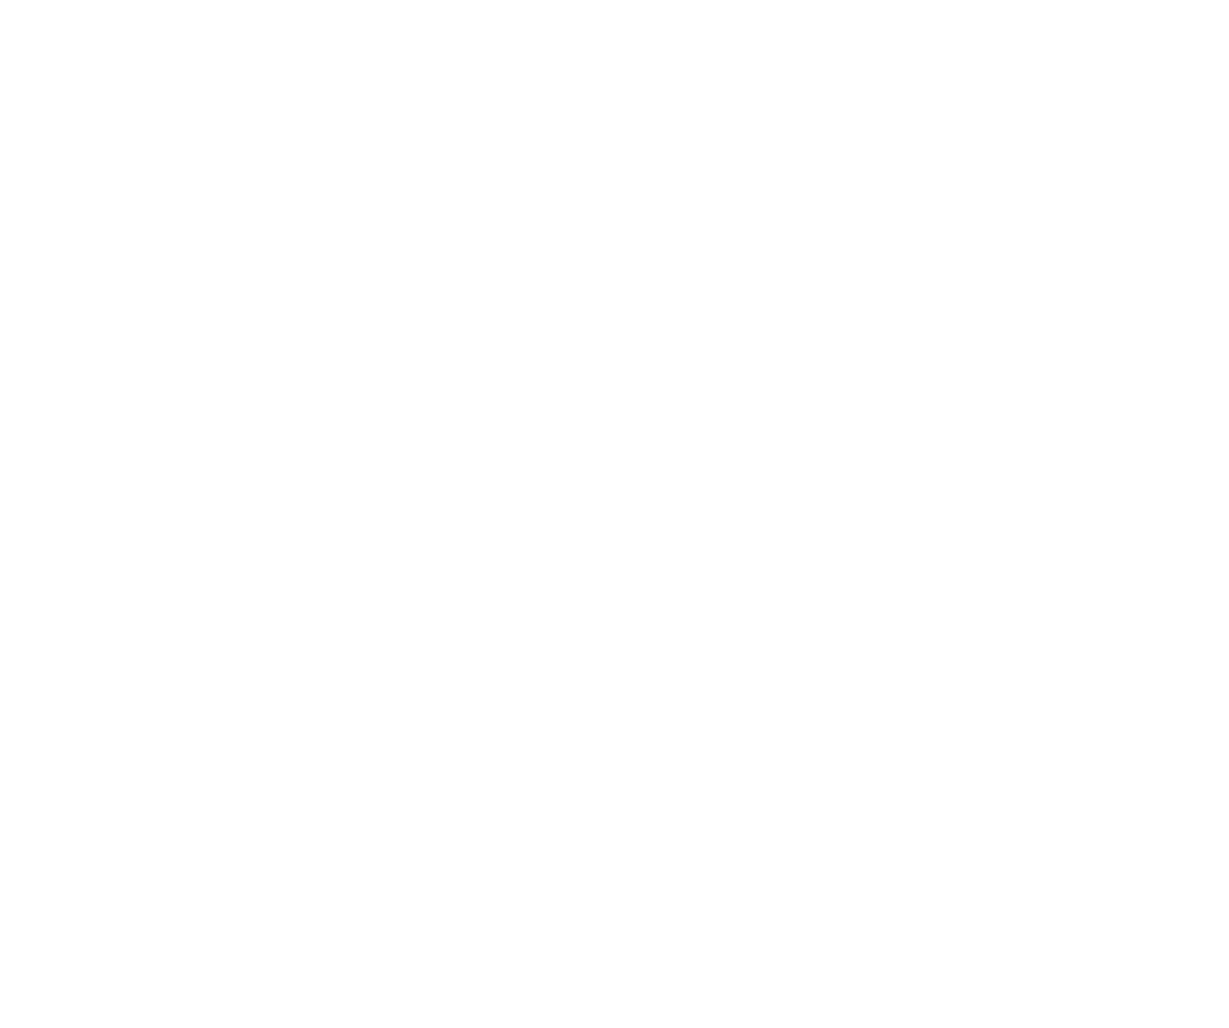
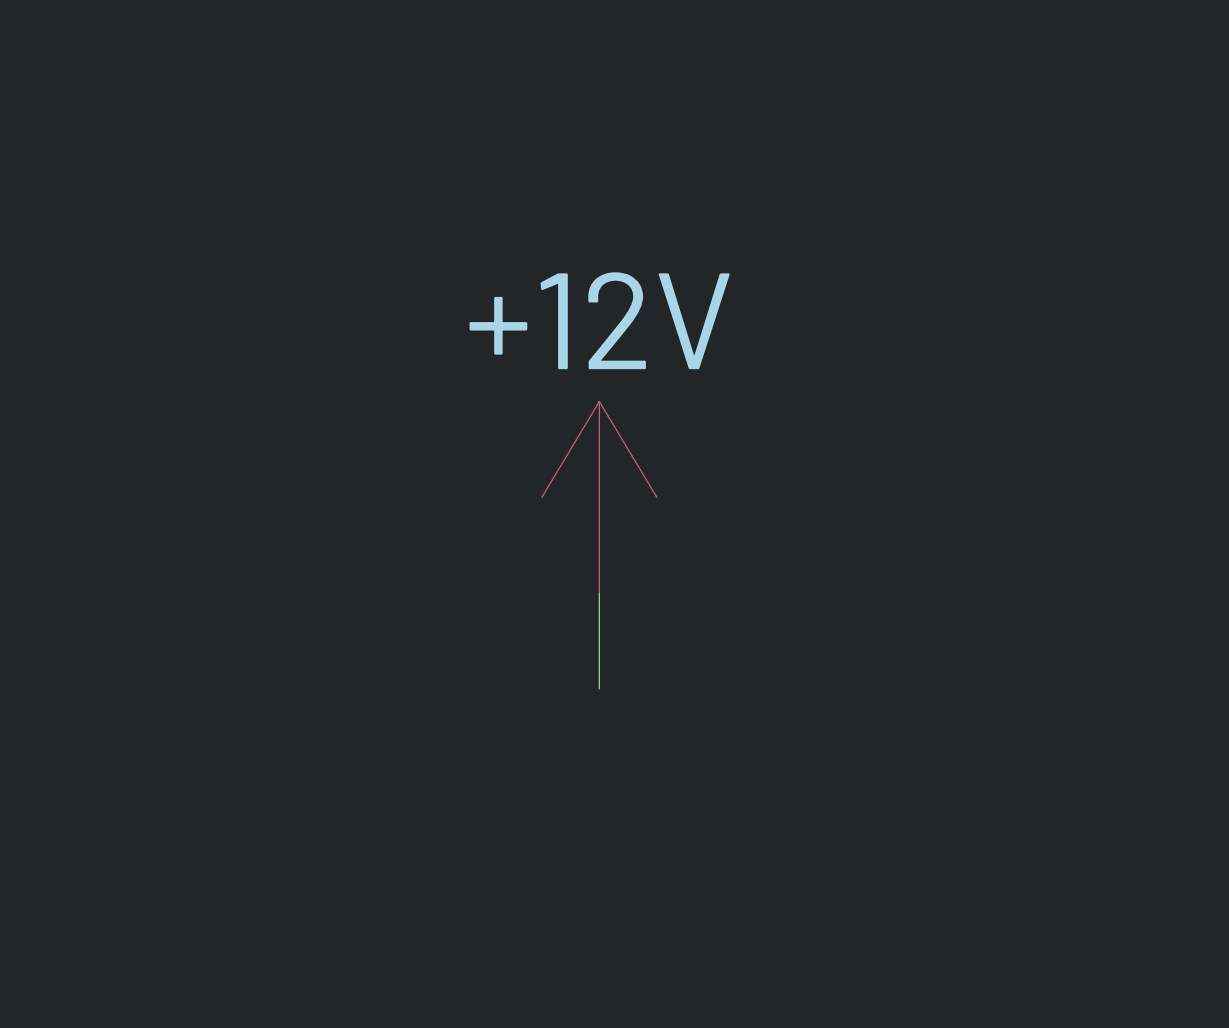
power symbol: none -> +12V (599, 497)
wire: none -> (599, 593) (599, 688)

